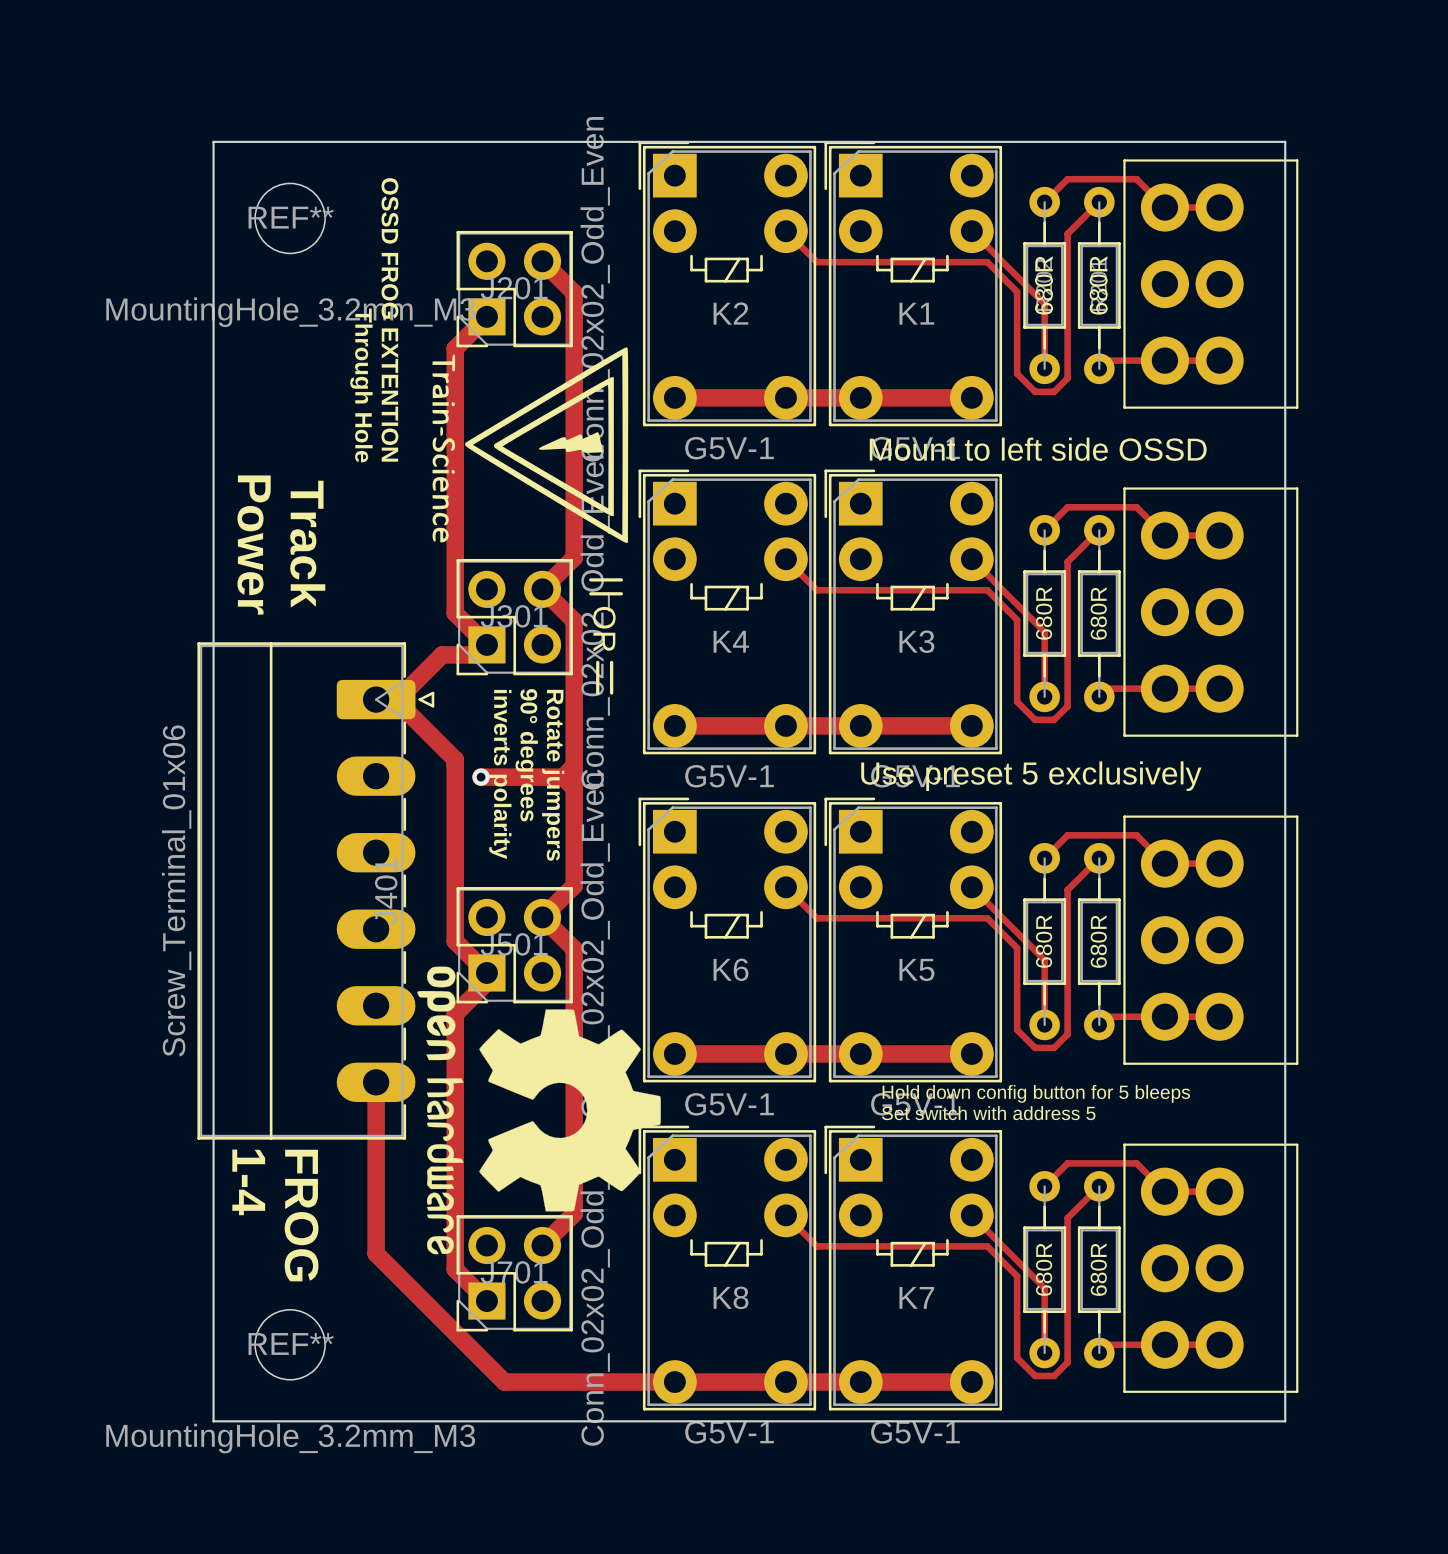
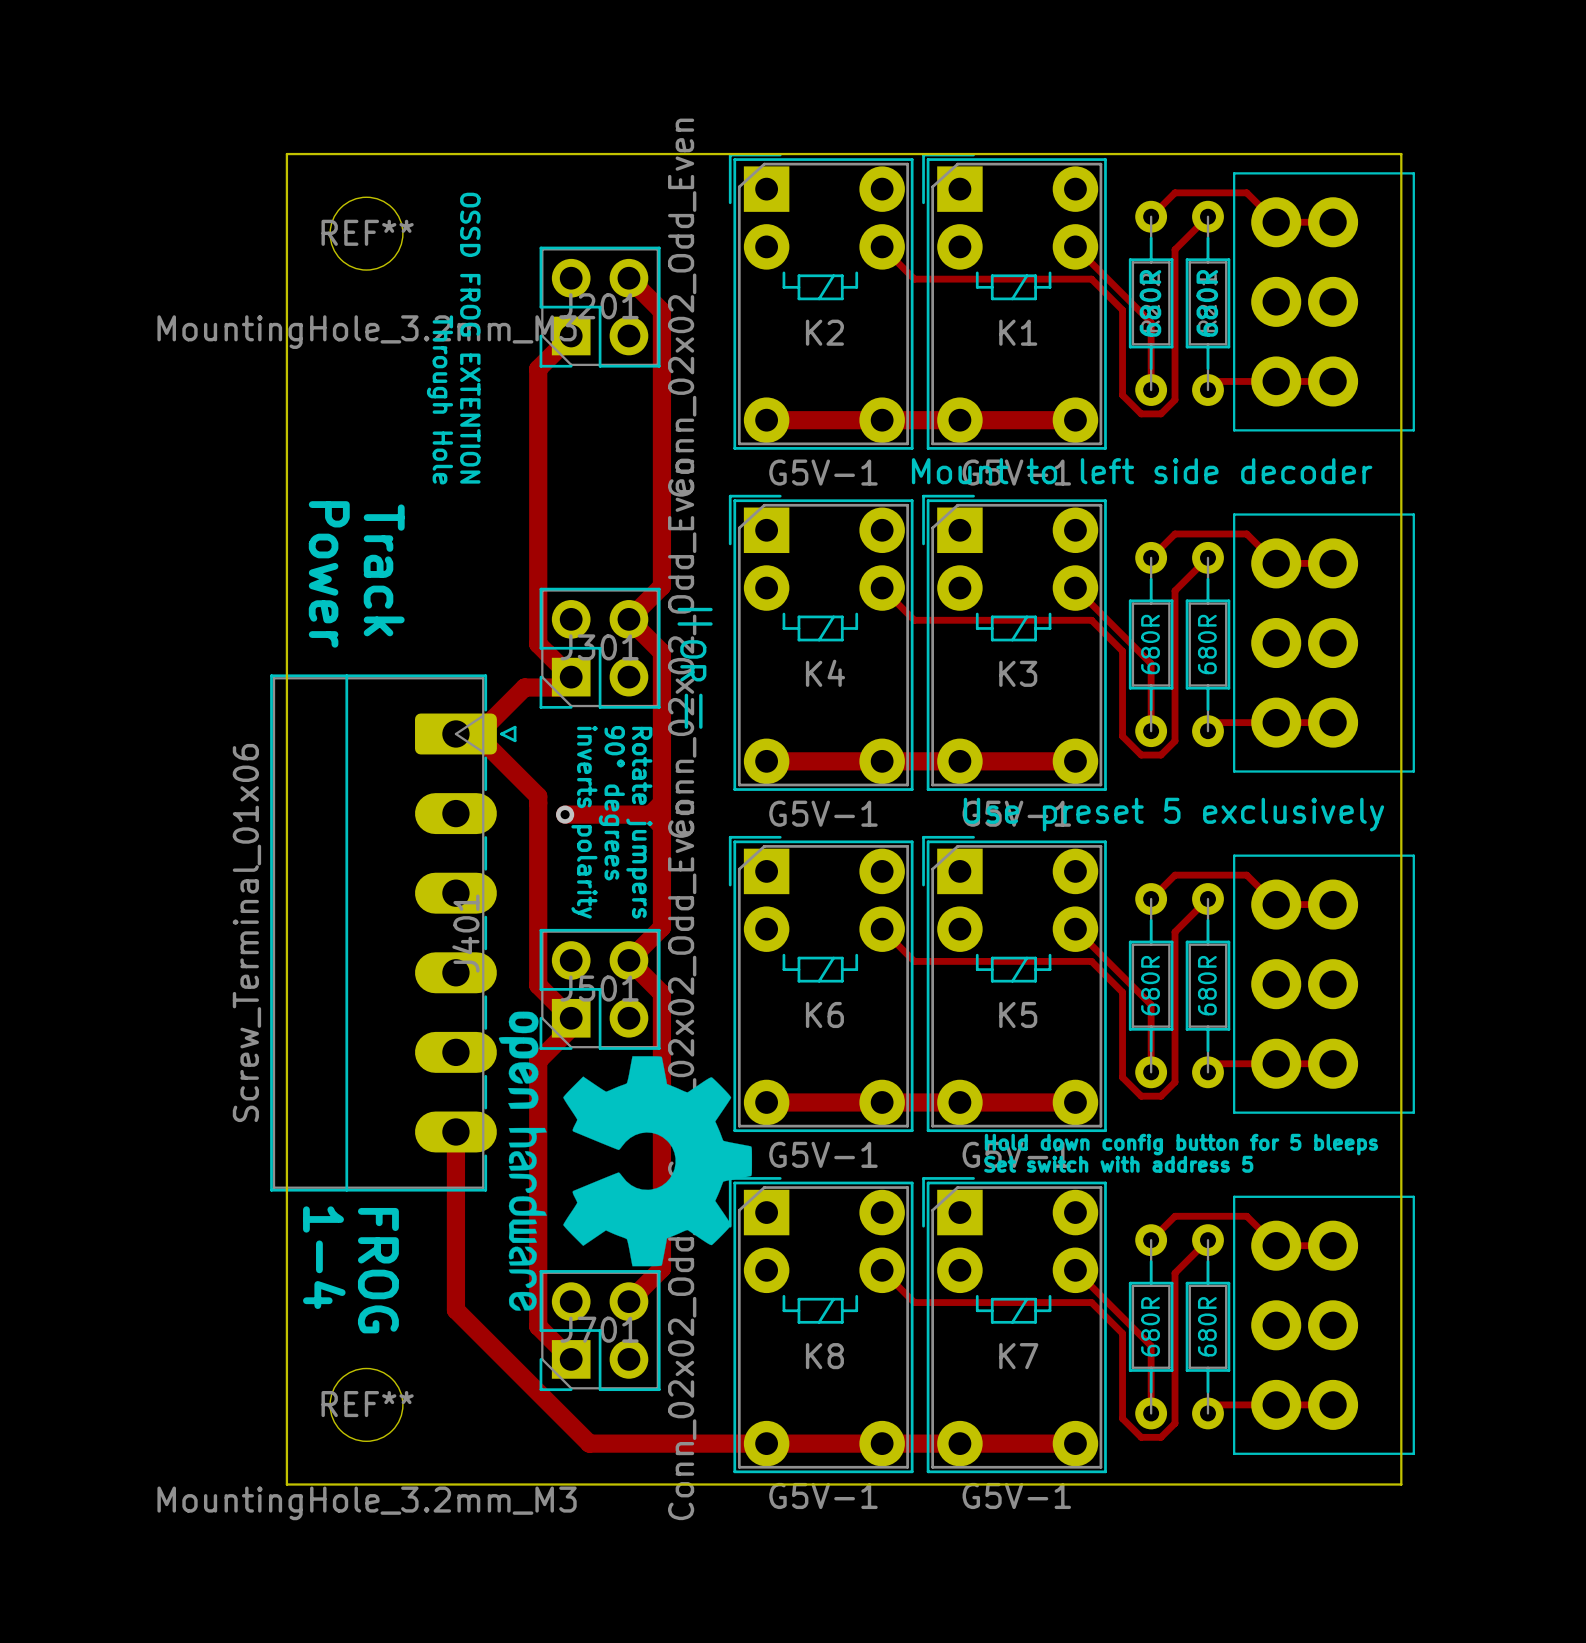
drawing: [432, 347, 629, 543] -> none
text: Mount to left side OSSD (1038, 449) -> Mount to left side decoder (1142, 471)

